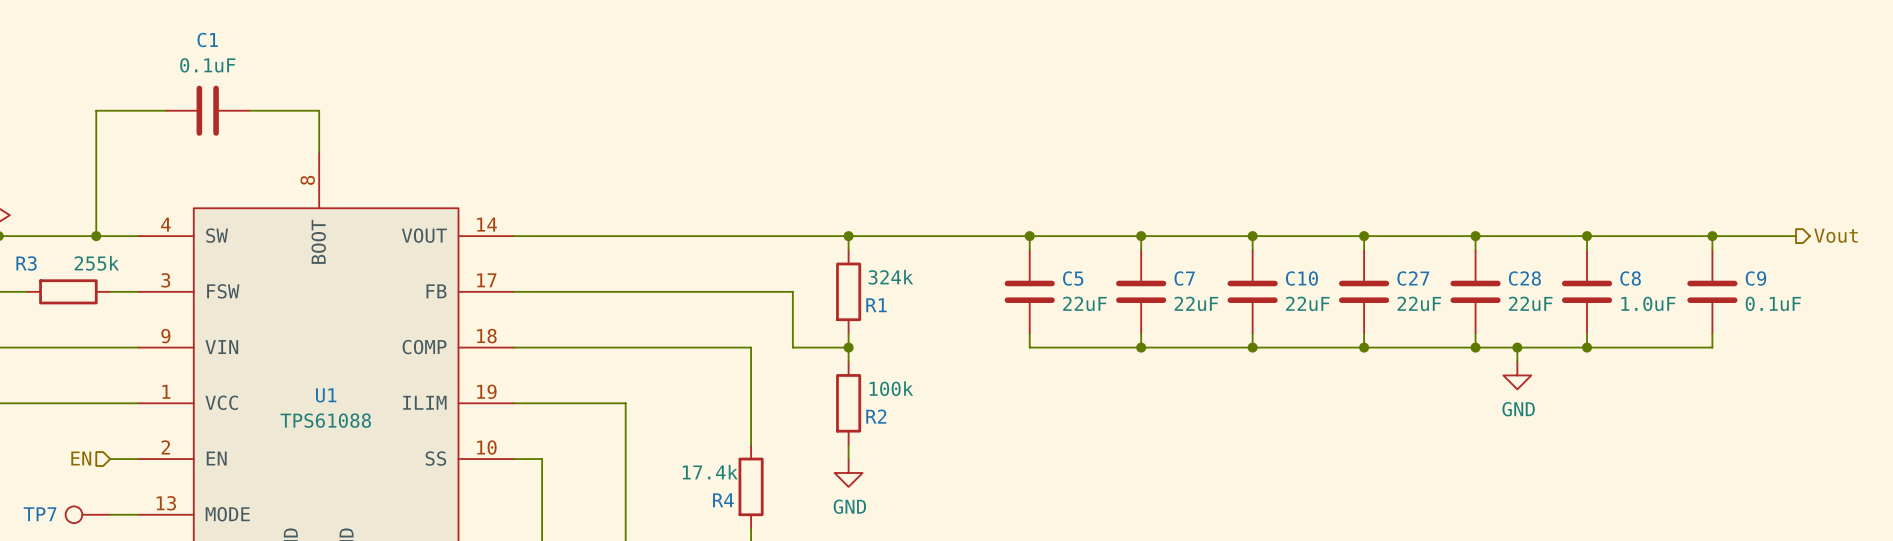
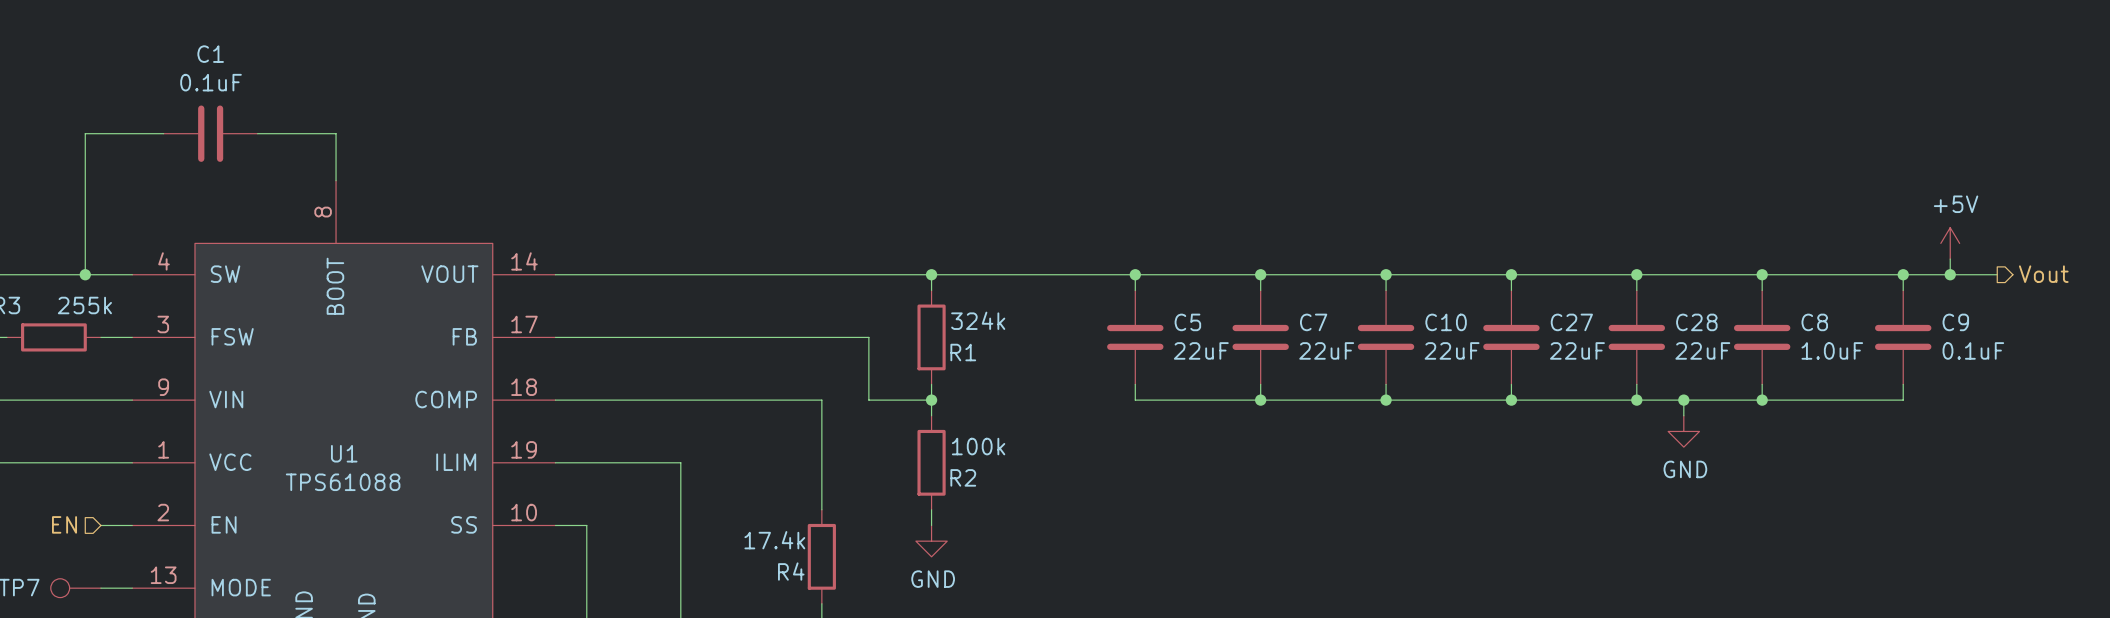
power symbol: none -> +5V (1950, 243)
wire: none -> (1950, 259) (1950, 274)
junction: none -> (1950, 274)

